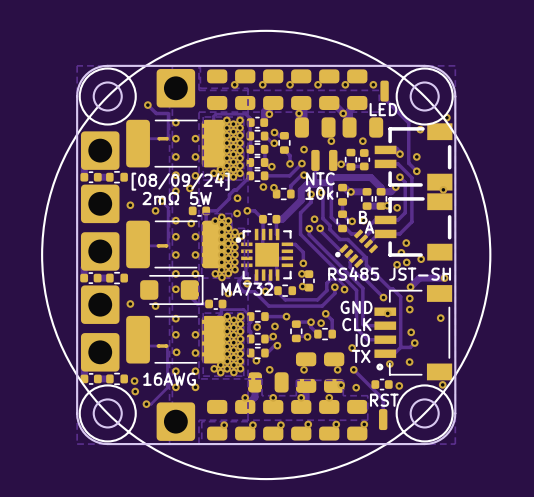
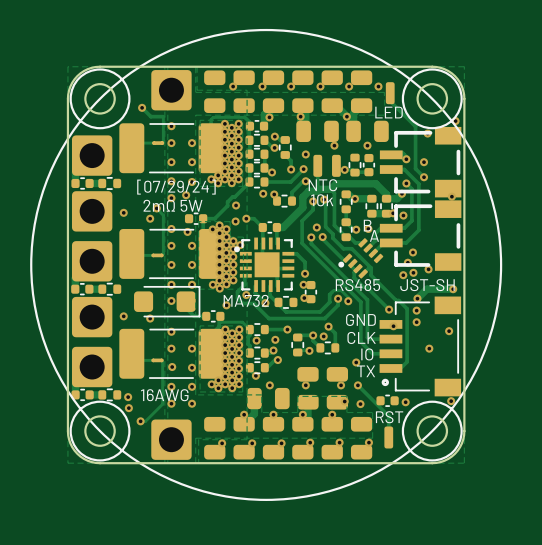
text: [08/09/24] (180, 181) -> [07/29/24] (176, 187)
via: (411, 332) -> none
via: none -> (429, 348)
track: (414, 343) (410, 347) (400, 347) -> none
via: (414, 343) -> none
via: (409, 362) -> none
via: (389, 364) -> none

